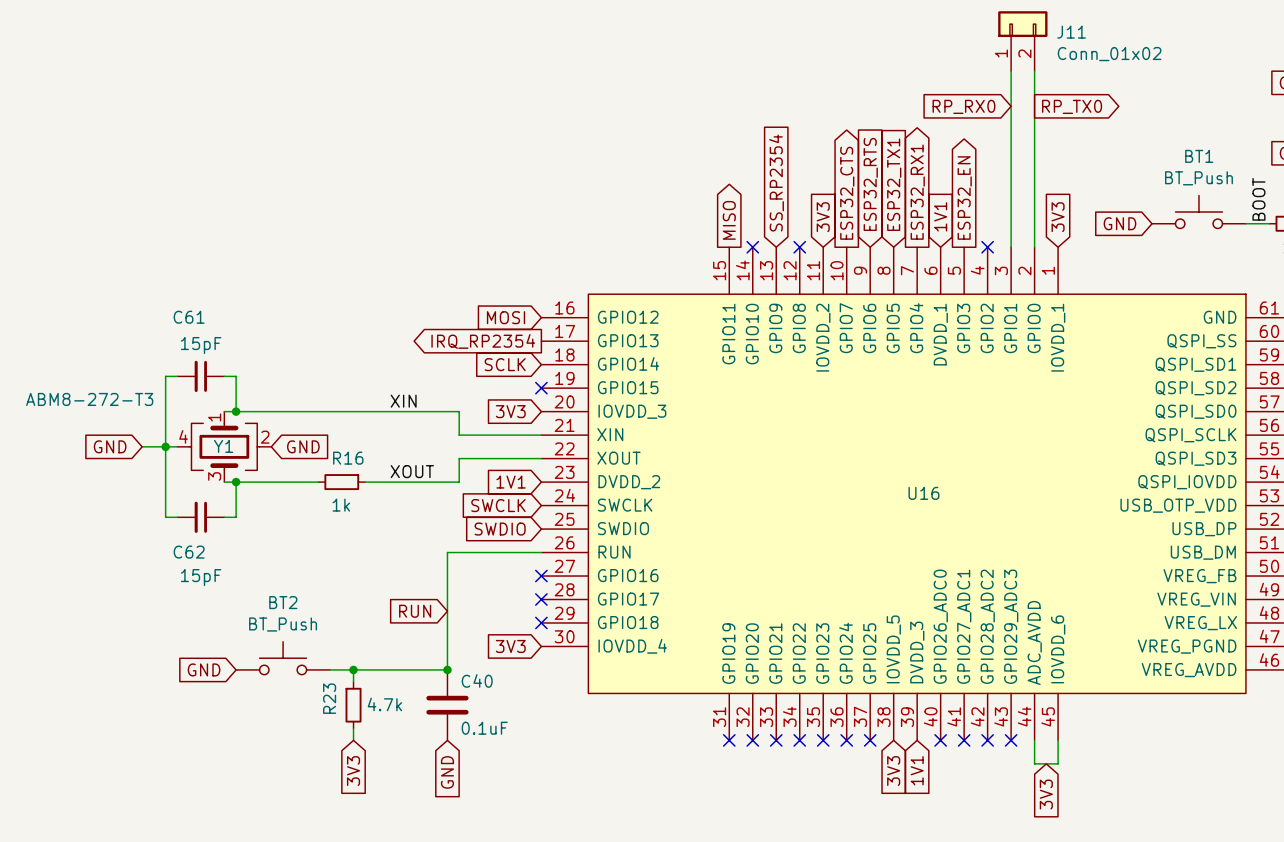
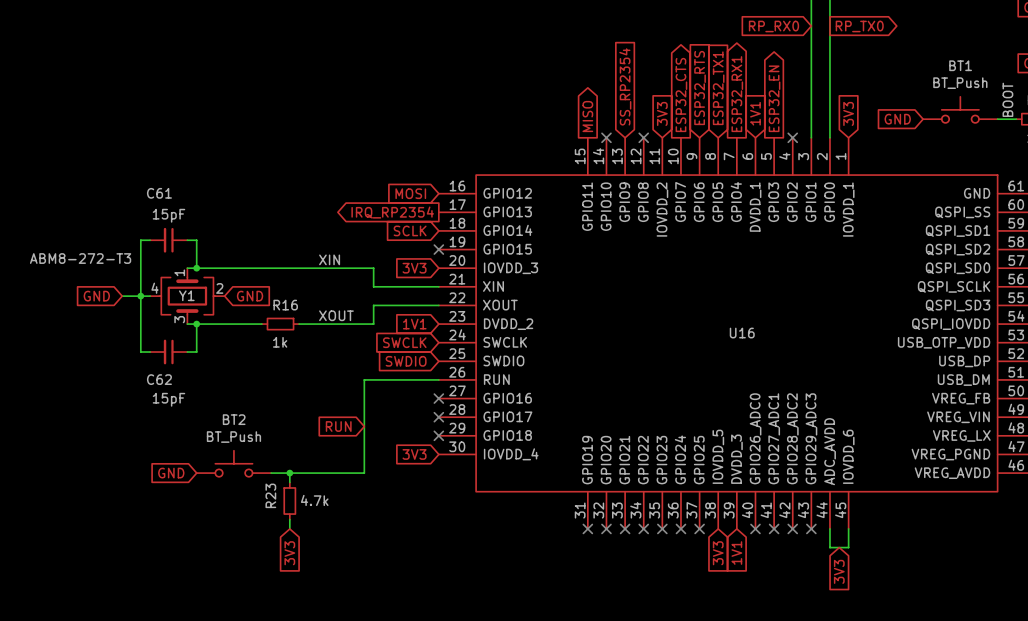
junction: (447, 669) -> none
C40: 0.1uF (447, 705) -> none
global label: GND (447, 772) -> none

